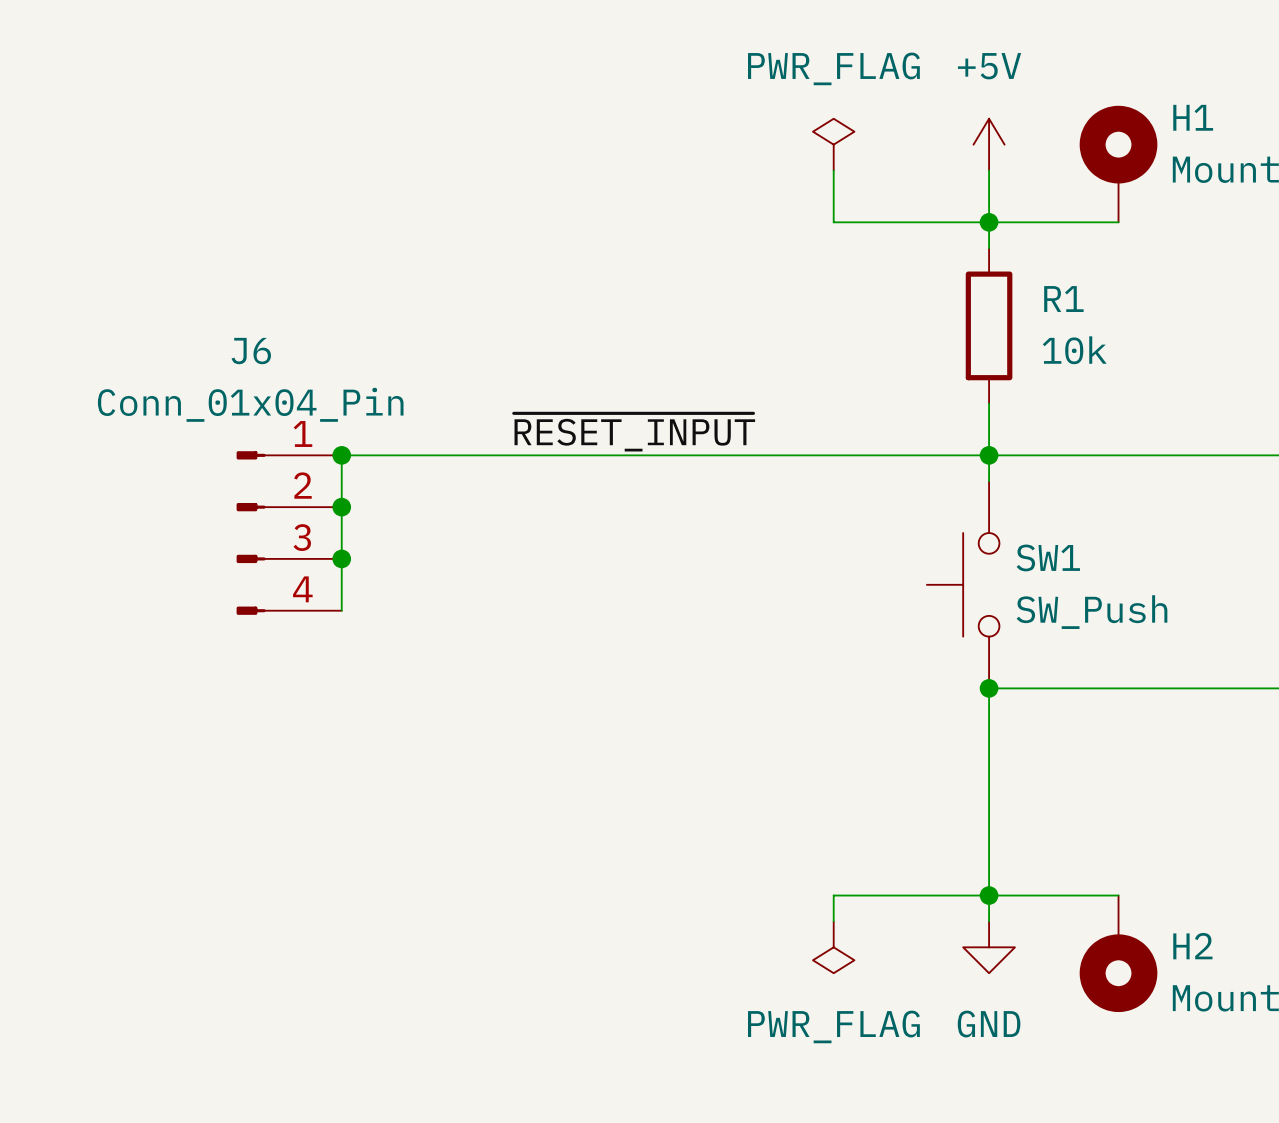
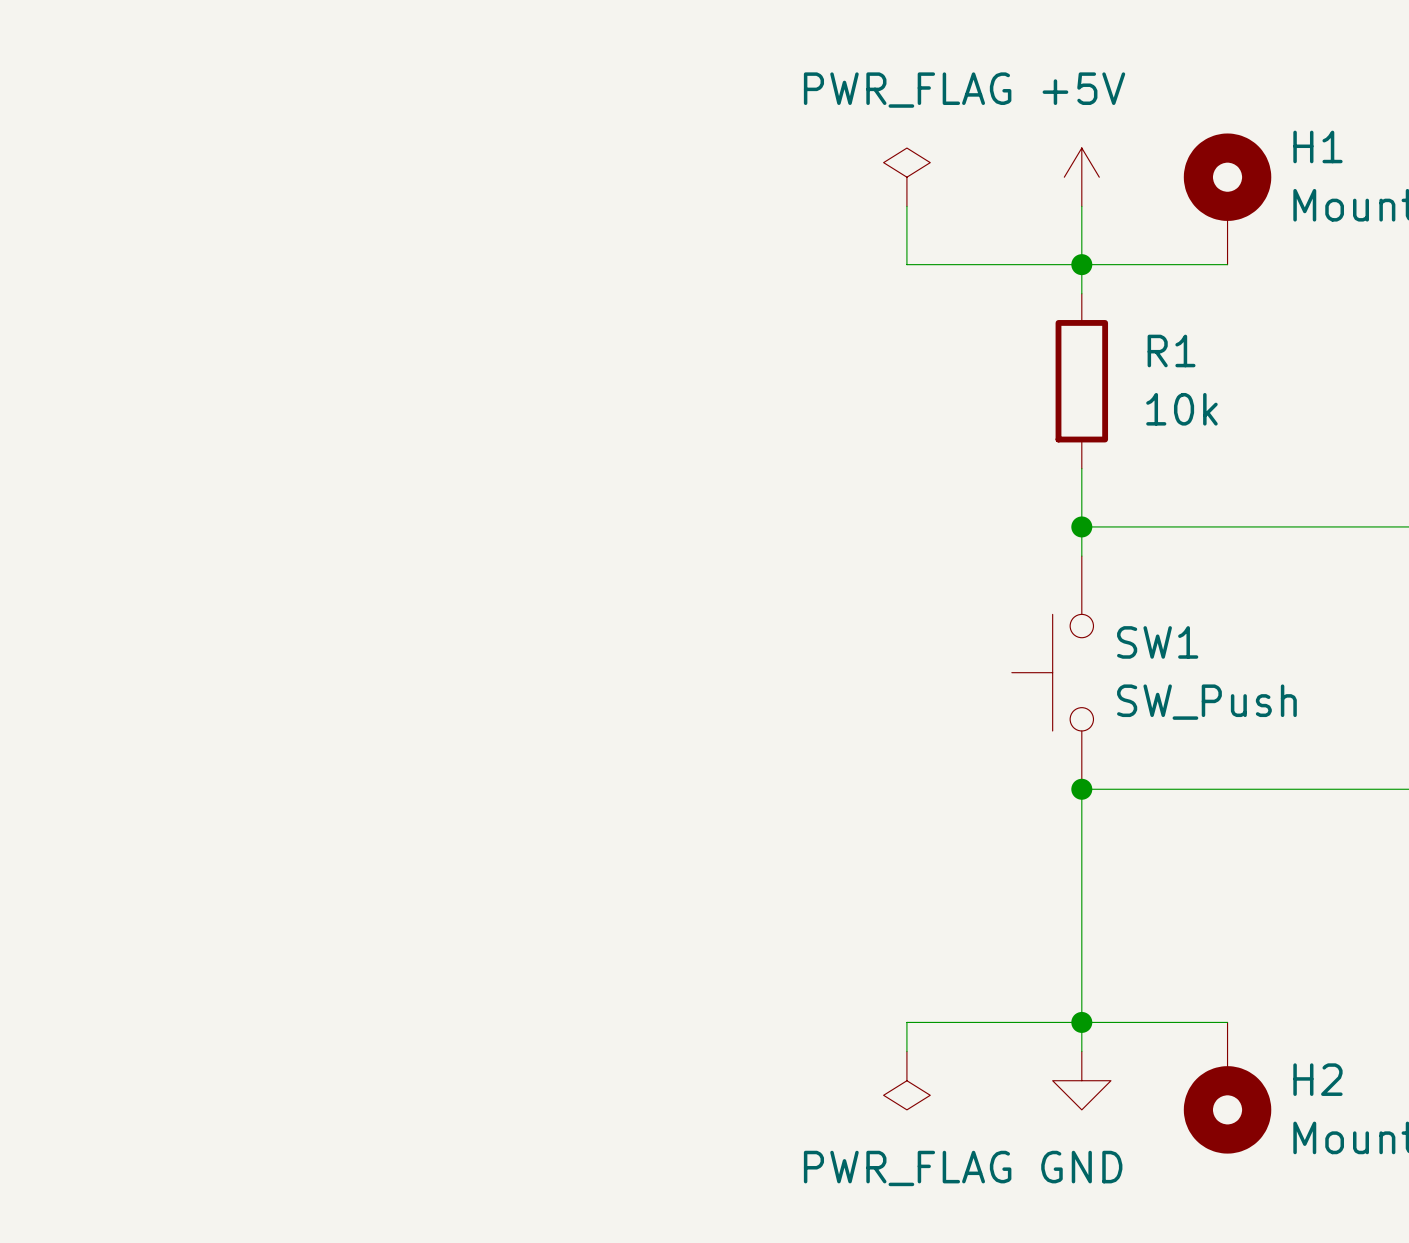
label: ~{RESET_INPUT} (634, 432) -> none
junction: (341, 455) -> none
wire: (989, 455) (341, 455) (341, 610) -> none
junction: (341, 507) -> none
J6: Conn_01x04_Pin (289, 533) -> none
junction: (341, 558) -> none

